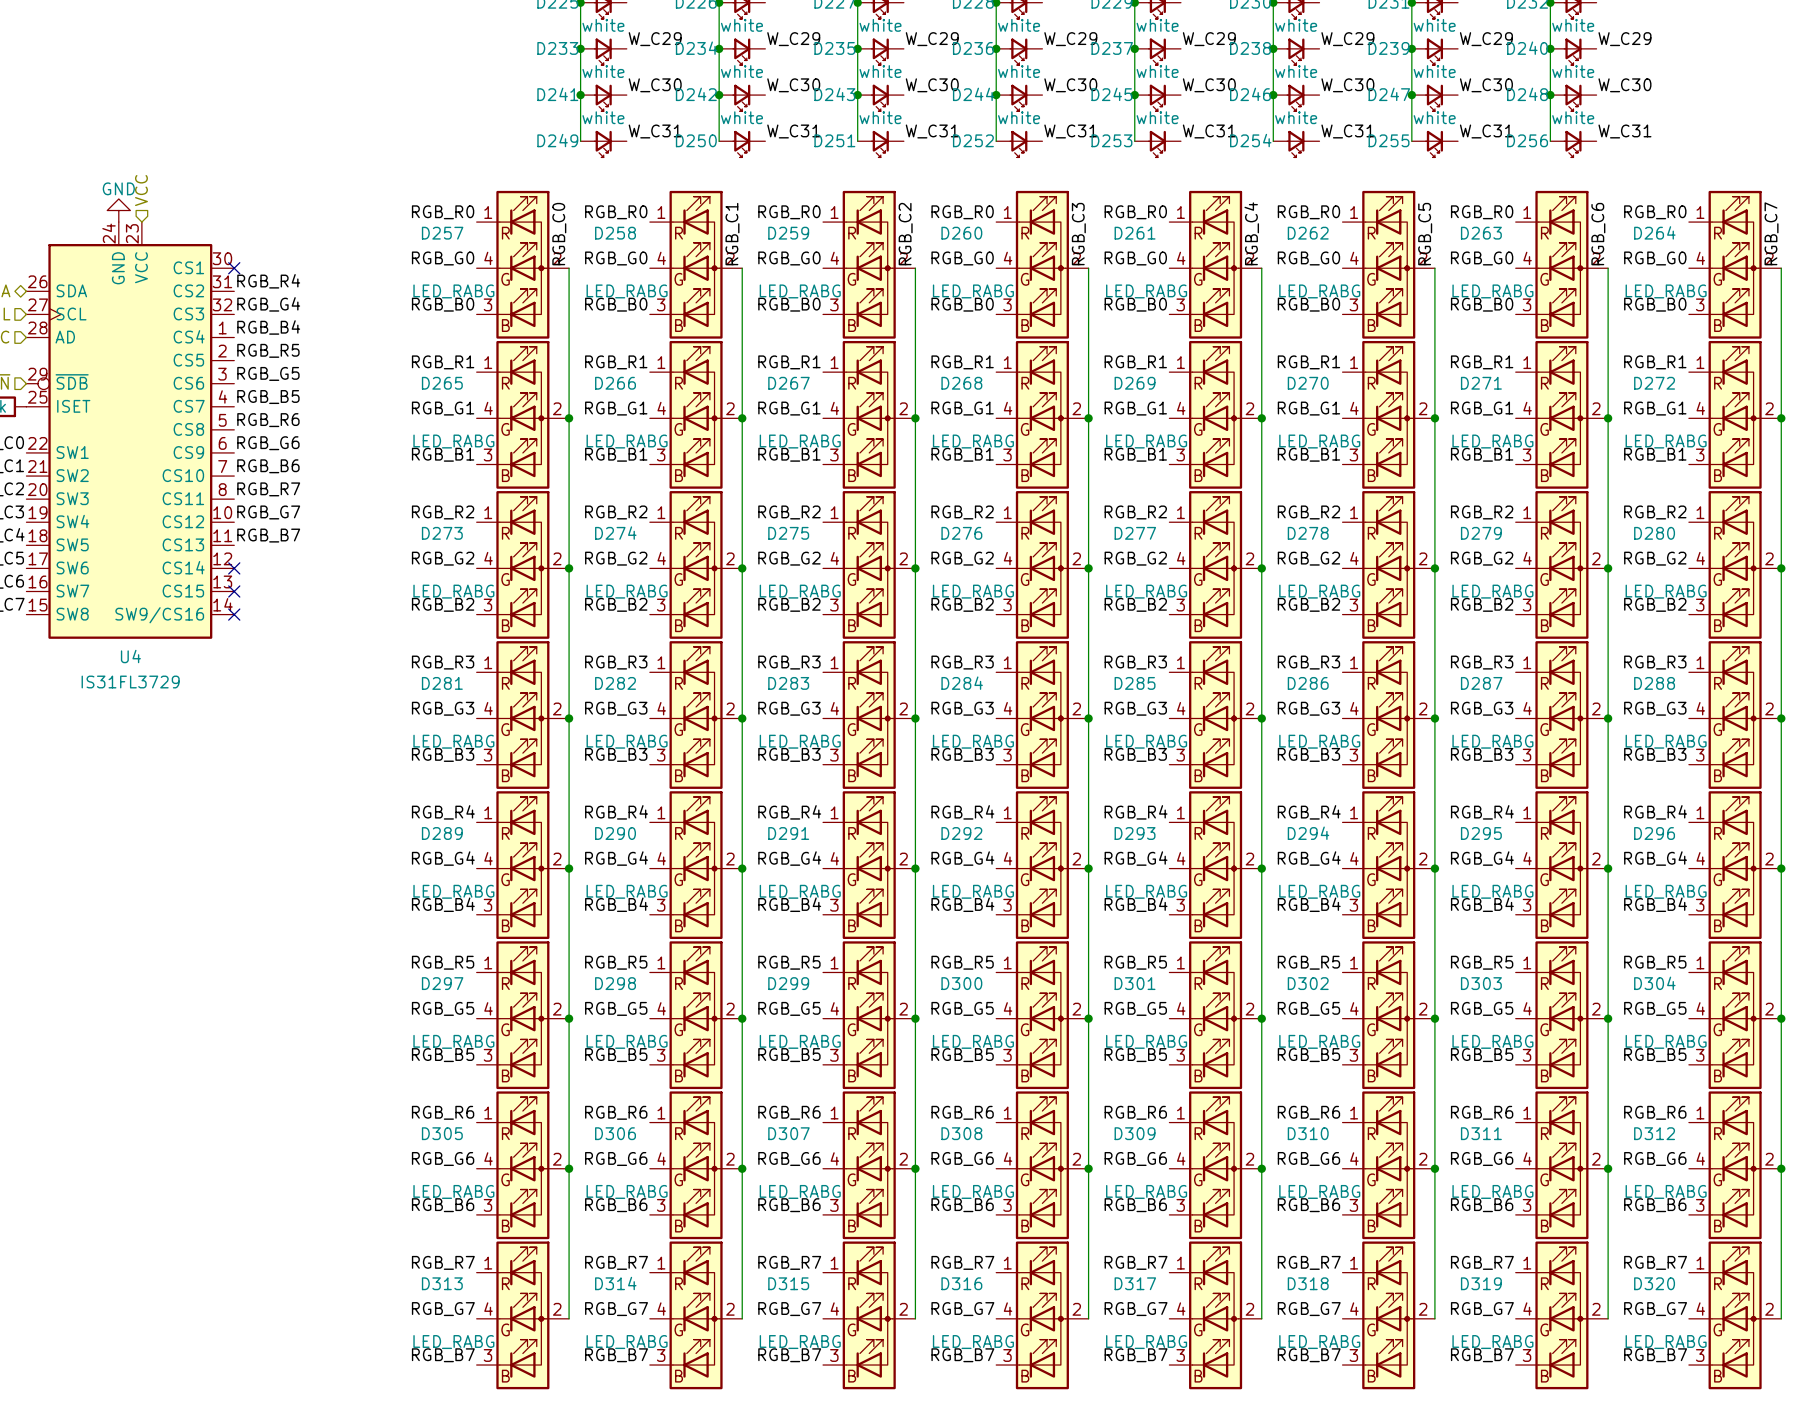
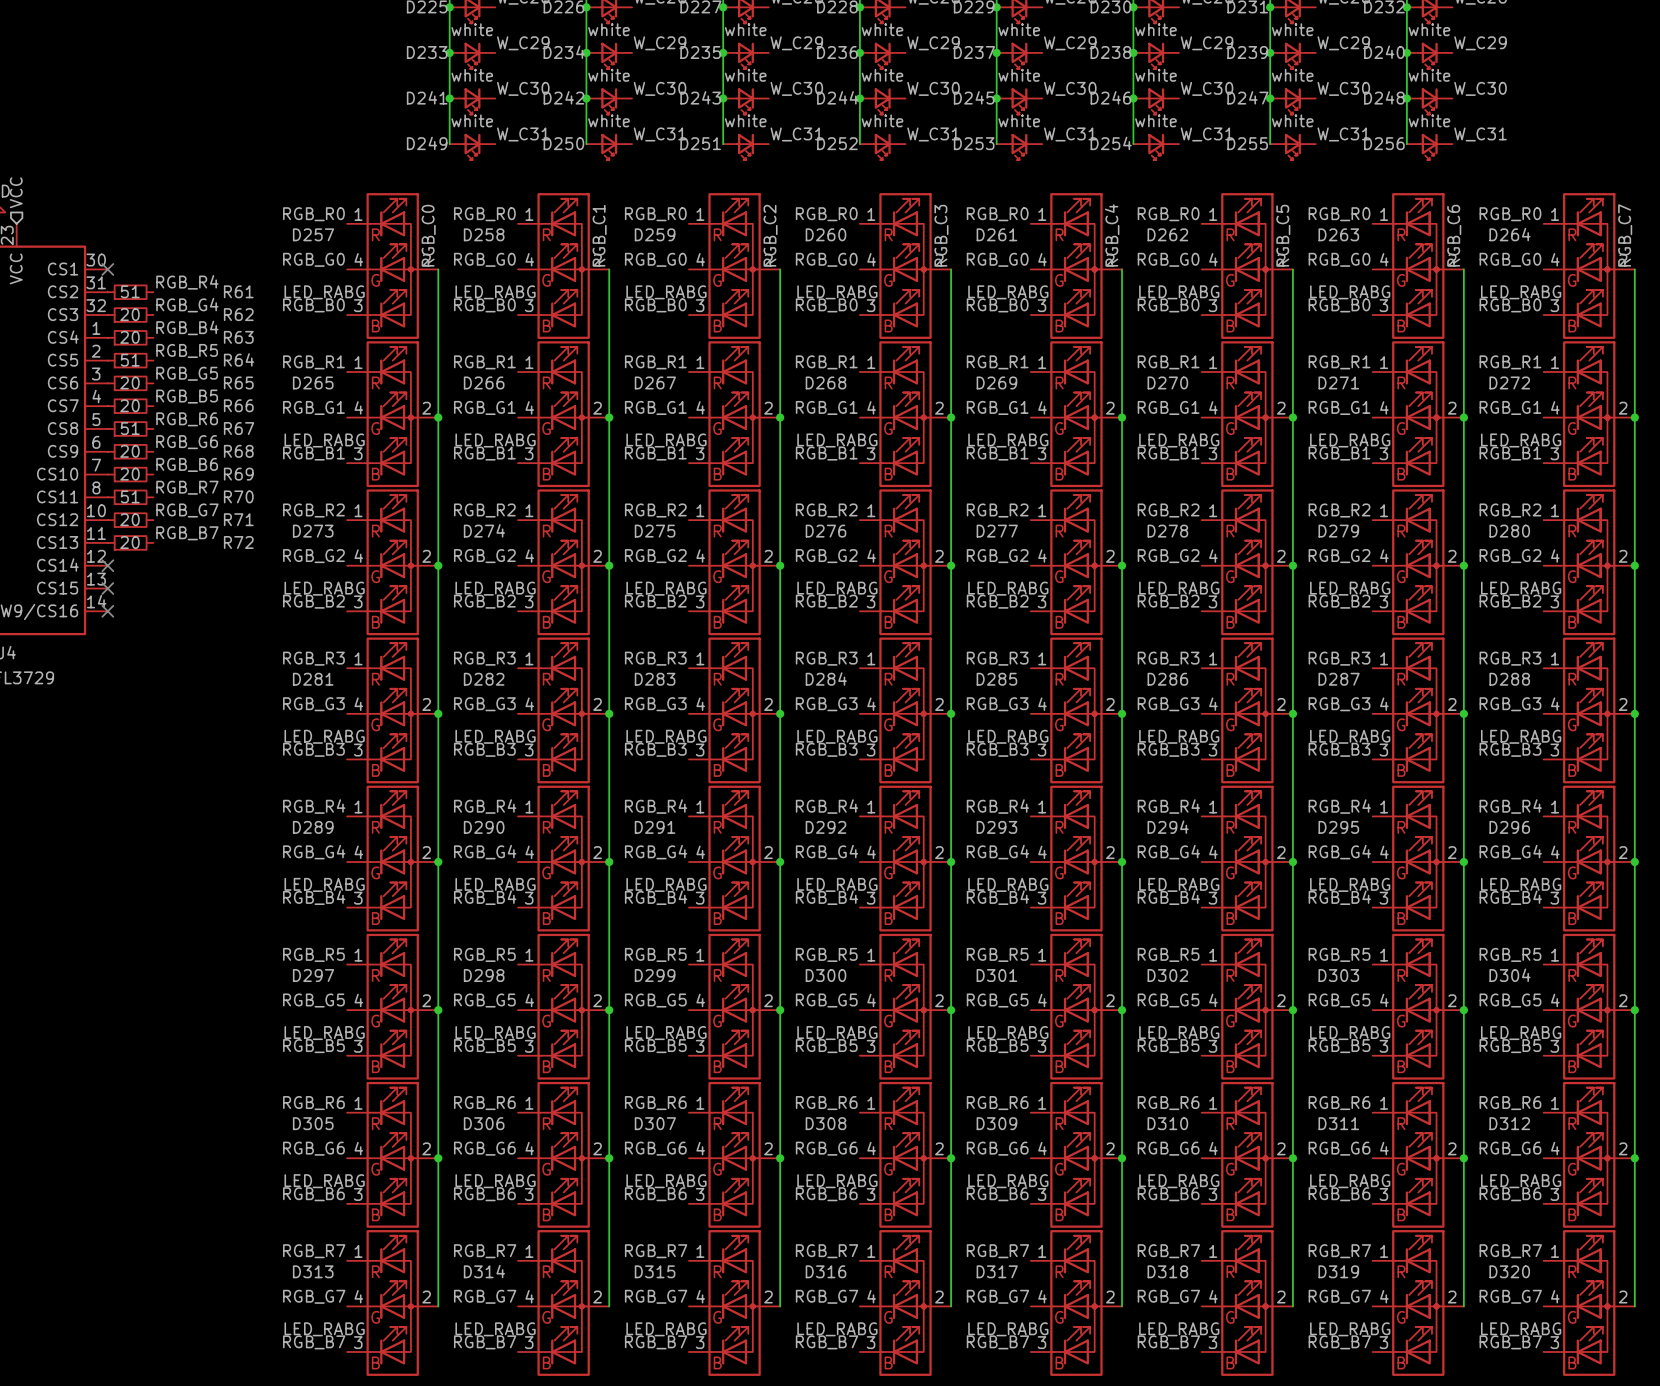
label position: RGB_R4 (268, 281) -> RGB_R4 (187, 282)
R61: none -> 51 (130, 292)
label position: RGB_G4 (268, 304) -> RGB_G4 (187, 305)
R62: none -> 20 (130, 315)
label position: RGB_B4 (268, 327) -> RGB_B4 (187, 327)
R63: none -> 20 (130, 337)
label position: RGB_R5 (268, 350) -> RGB_R5 (187, 350)
R64: none -> 51 (130, 360)
label position: RGB_G5 (268, 373) -> RGB_G5 (187, 373)
R65: none -> 20 (130, 383)
label position: RGB_B5 (268, 397) -> RGB_B5 (187, 396)
R66: none -> 20 (130, 406)
label position: RGB_R6 (268, 420) -> RGB_R6 (187, 419)
R67: none -> 51 (130, 428)
label position: RGB_G6 (268, 443) -> RGB_G6 (187, 442)
R68: none -> 20 (130, 451)
label position: RGB_B6 (268, 466) -> RGB_B6 (187, 464)
R69: none -> 20 (130, 474)
label position: RGB_R7 (268, 489) -> RGB_R7 (187, 487)
R70: none -> 51 (130, 497)
label position: RGB_G7 (268, 512) -> RGB_G7 (187, 510)
R71: none -> 20 (130, 520)
label position: RGB_B7 (268, 535) -> RGB_B7 (187, 533)
R72: none -> 20 (130, 542)

